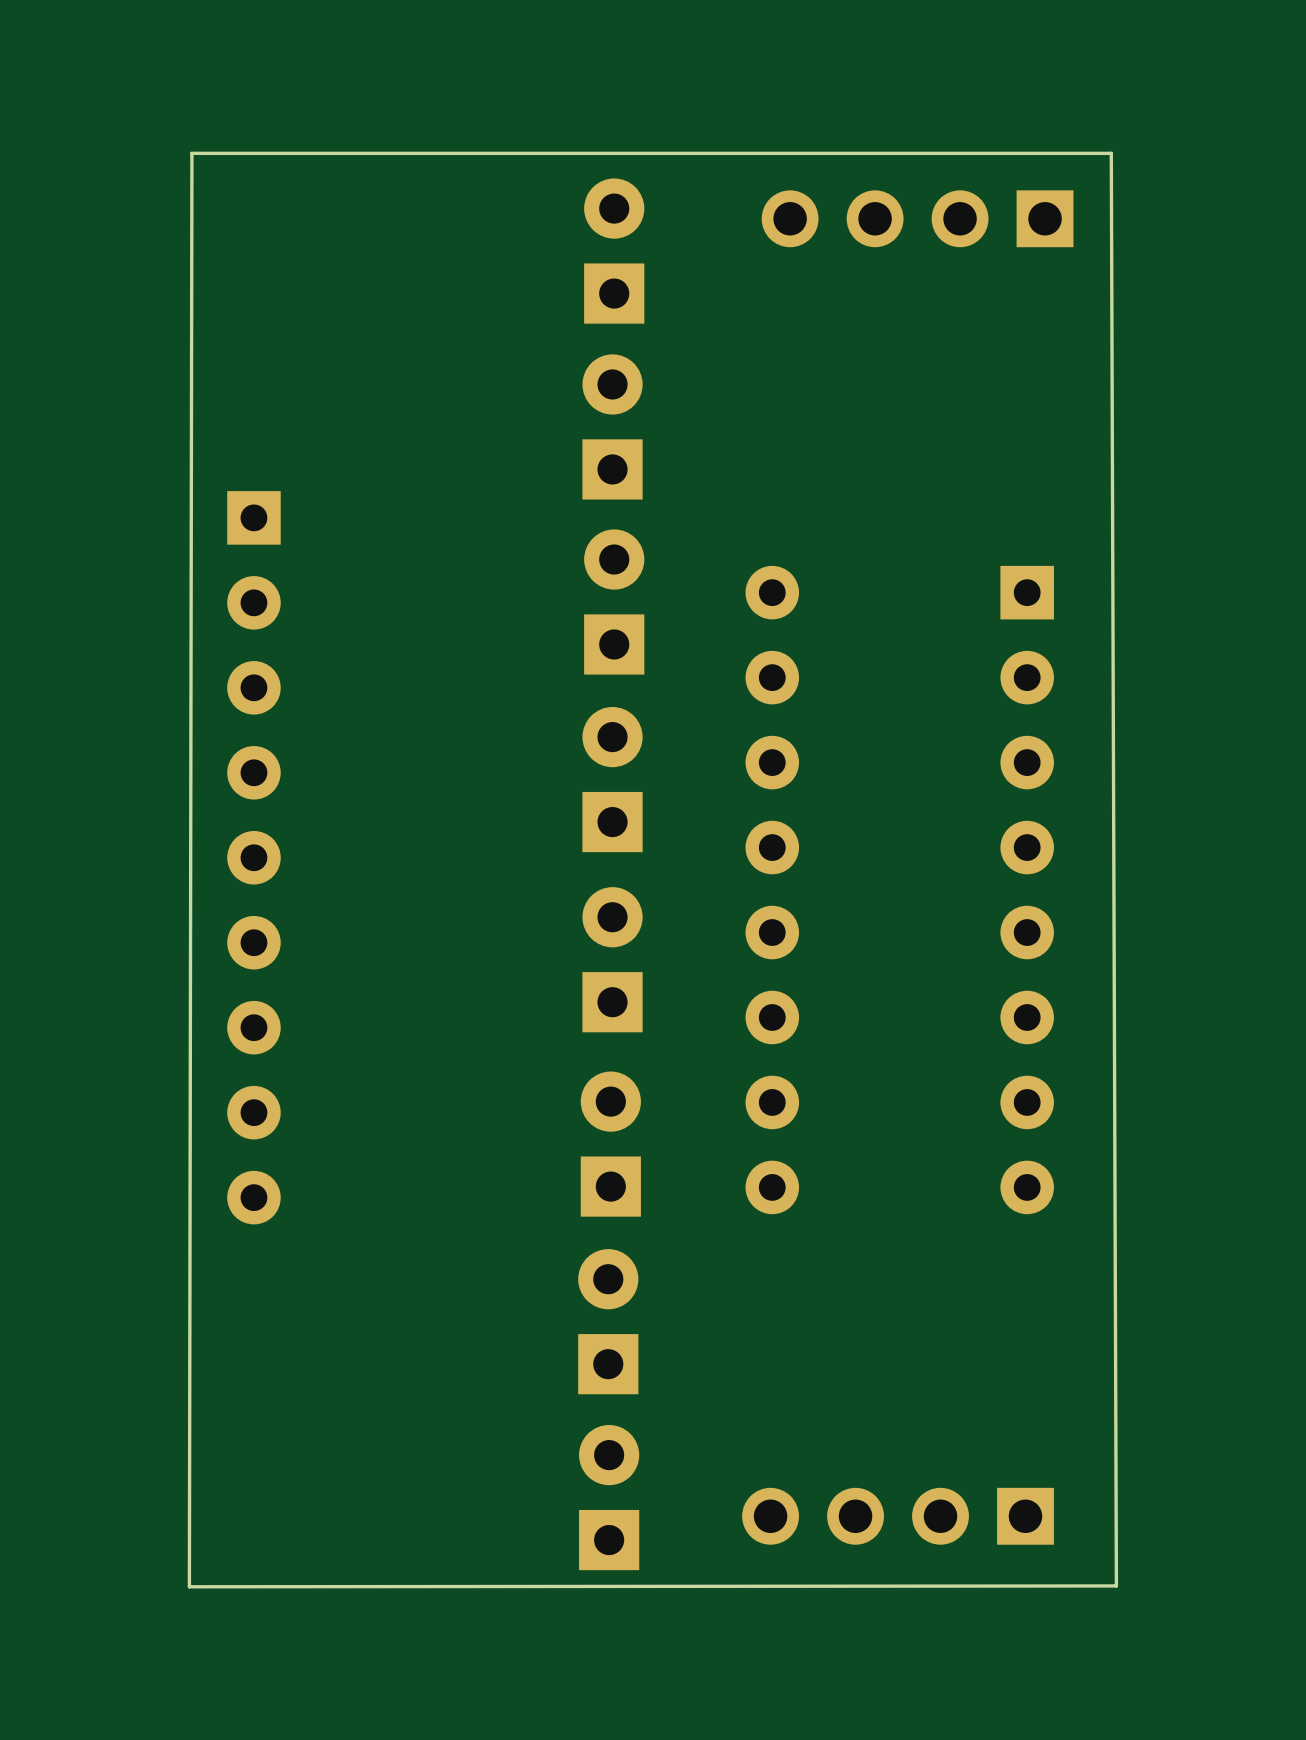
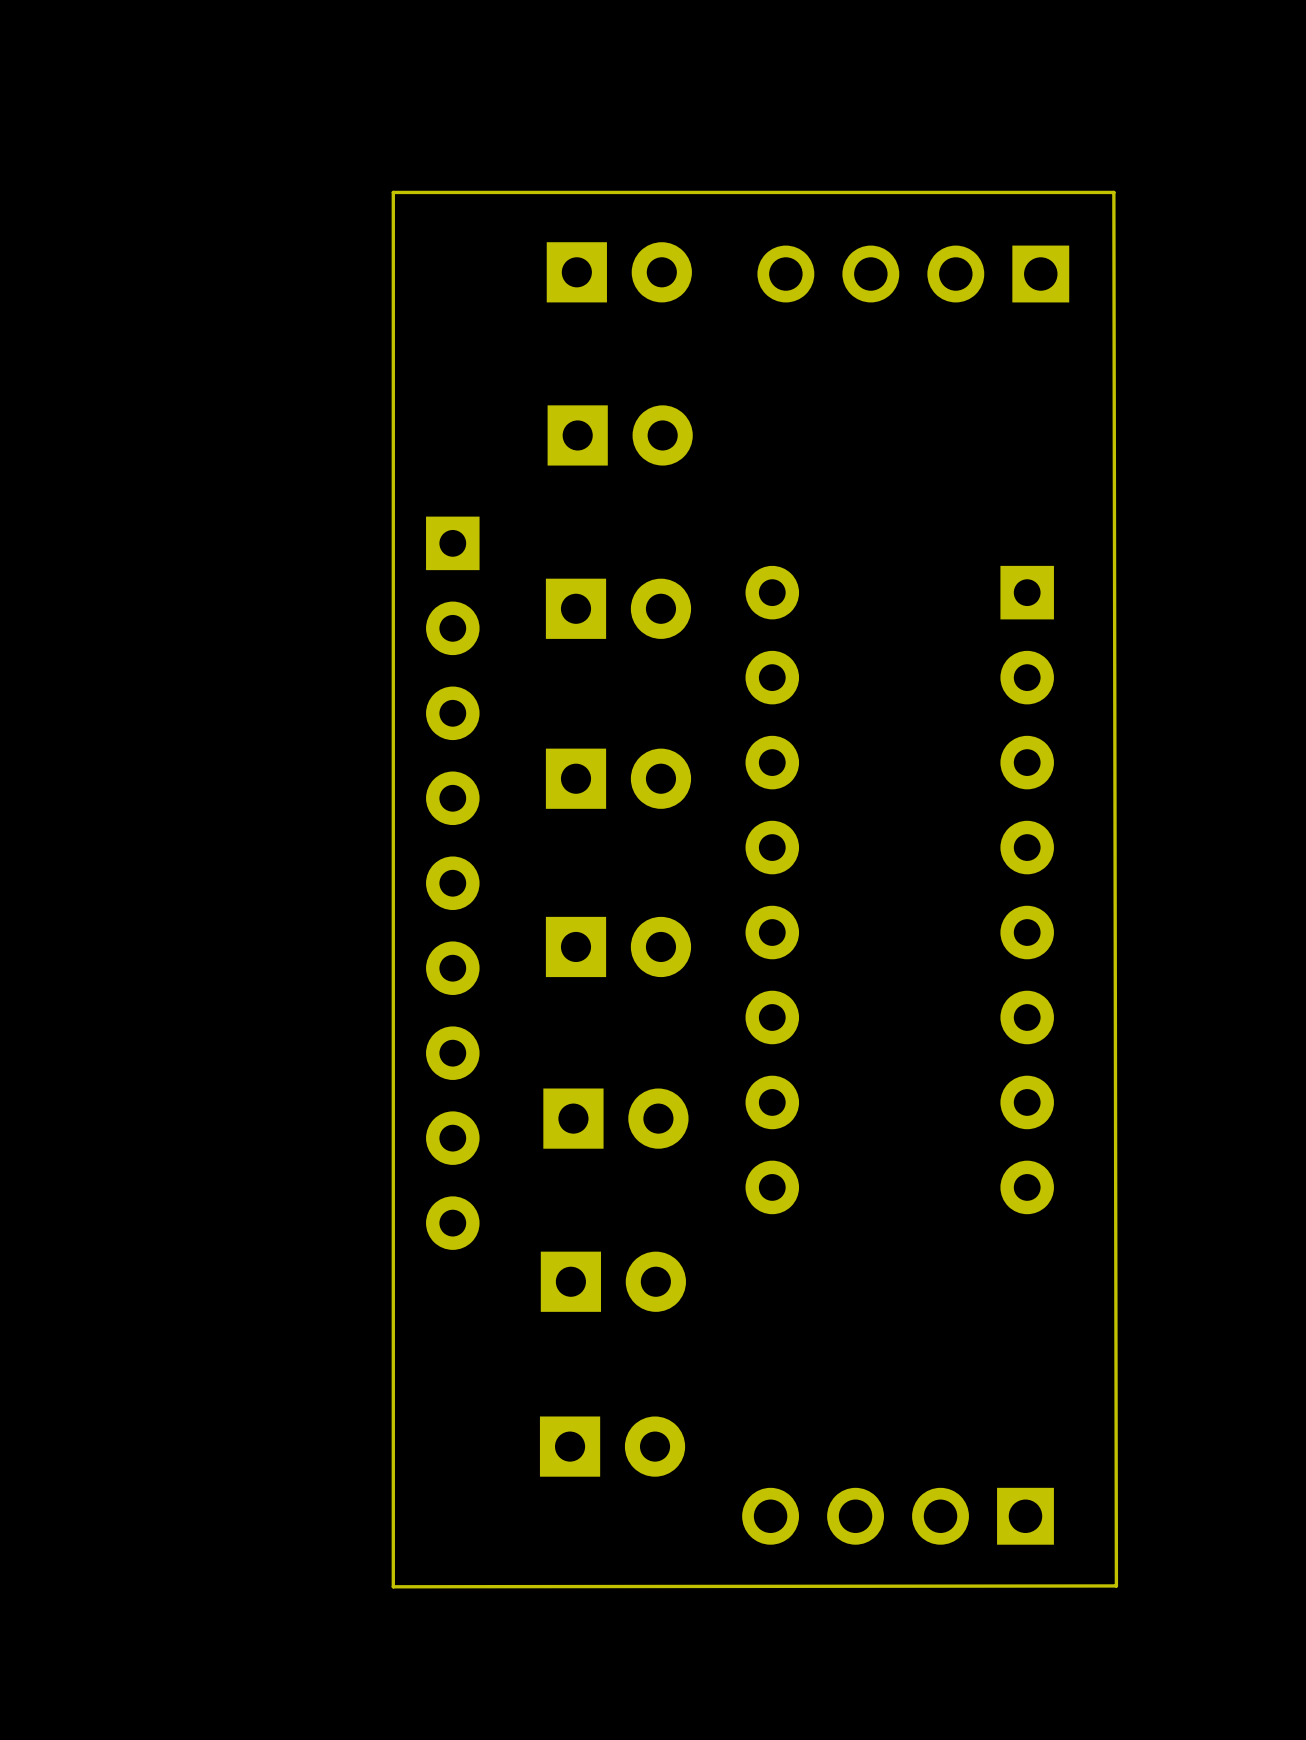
board edge: (1111, 153) (1116, 1585) (189, 1586) (191, 153) (1111, 153) -> (1113, 192) (1116, 1585) (393, 1586) (393, 192) (1113, 192)
part position: (917, 218) -> (913, 274)
part rotation: 0° (614, 251) -> 90° clockwise (619, 272)
part rotation: 0° (612, 426) -> 90° clockwise (620, 435)
part rotation: 0° (614, 601) -> 90° clockwise (618, 608)
part rotation: 0° (612, 779) -> 90° clockwise (618, 778)
part position: (253, 857) -> (452, 883)
part rotation: 0° (612, 959) -> 90° clockwise (618, 946)
part rotation: 0° (610, 1144) -> 90° clockwise (615, 1118)
part rotation: 0° (608, 1321) -> 90° clockwise (613, 1281)
part rotation: 0° (609, 1497) -> 90° clockwise (612, 1446)

